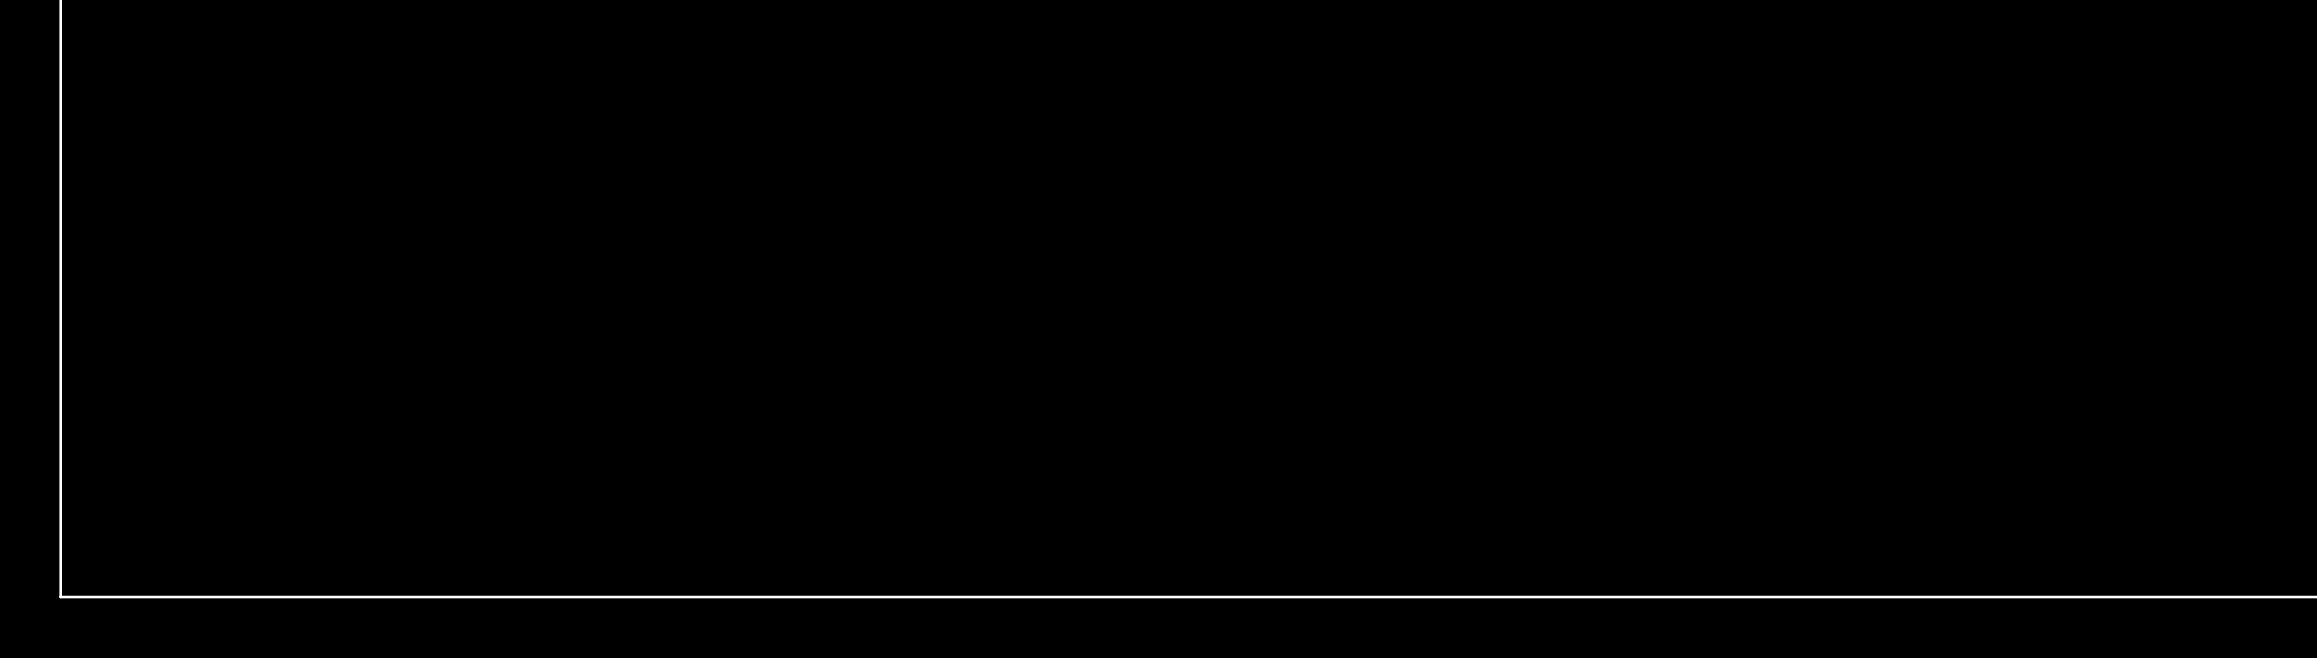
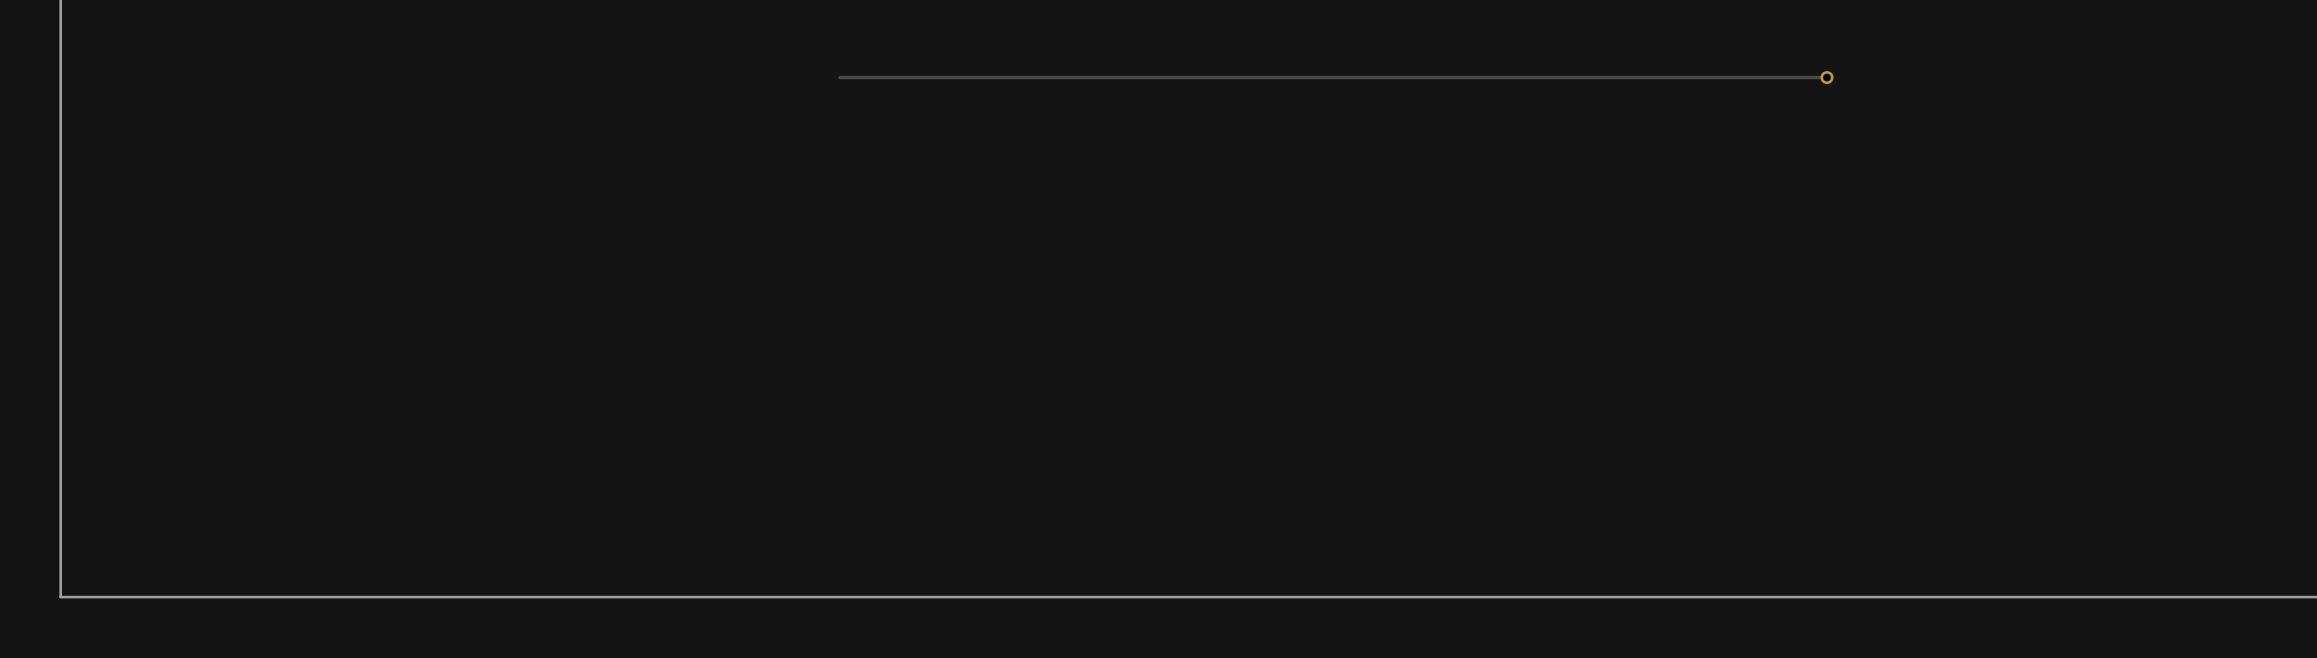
track: none -> (1826, 77) (839, 77)
via: none -> (1826, 77)

